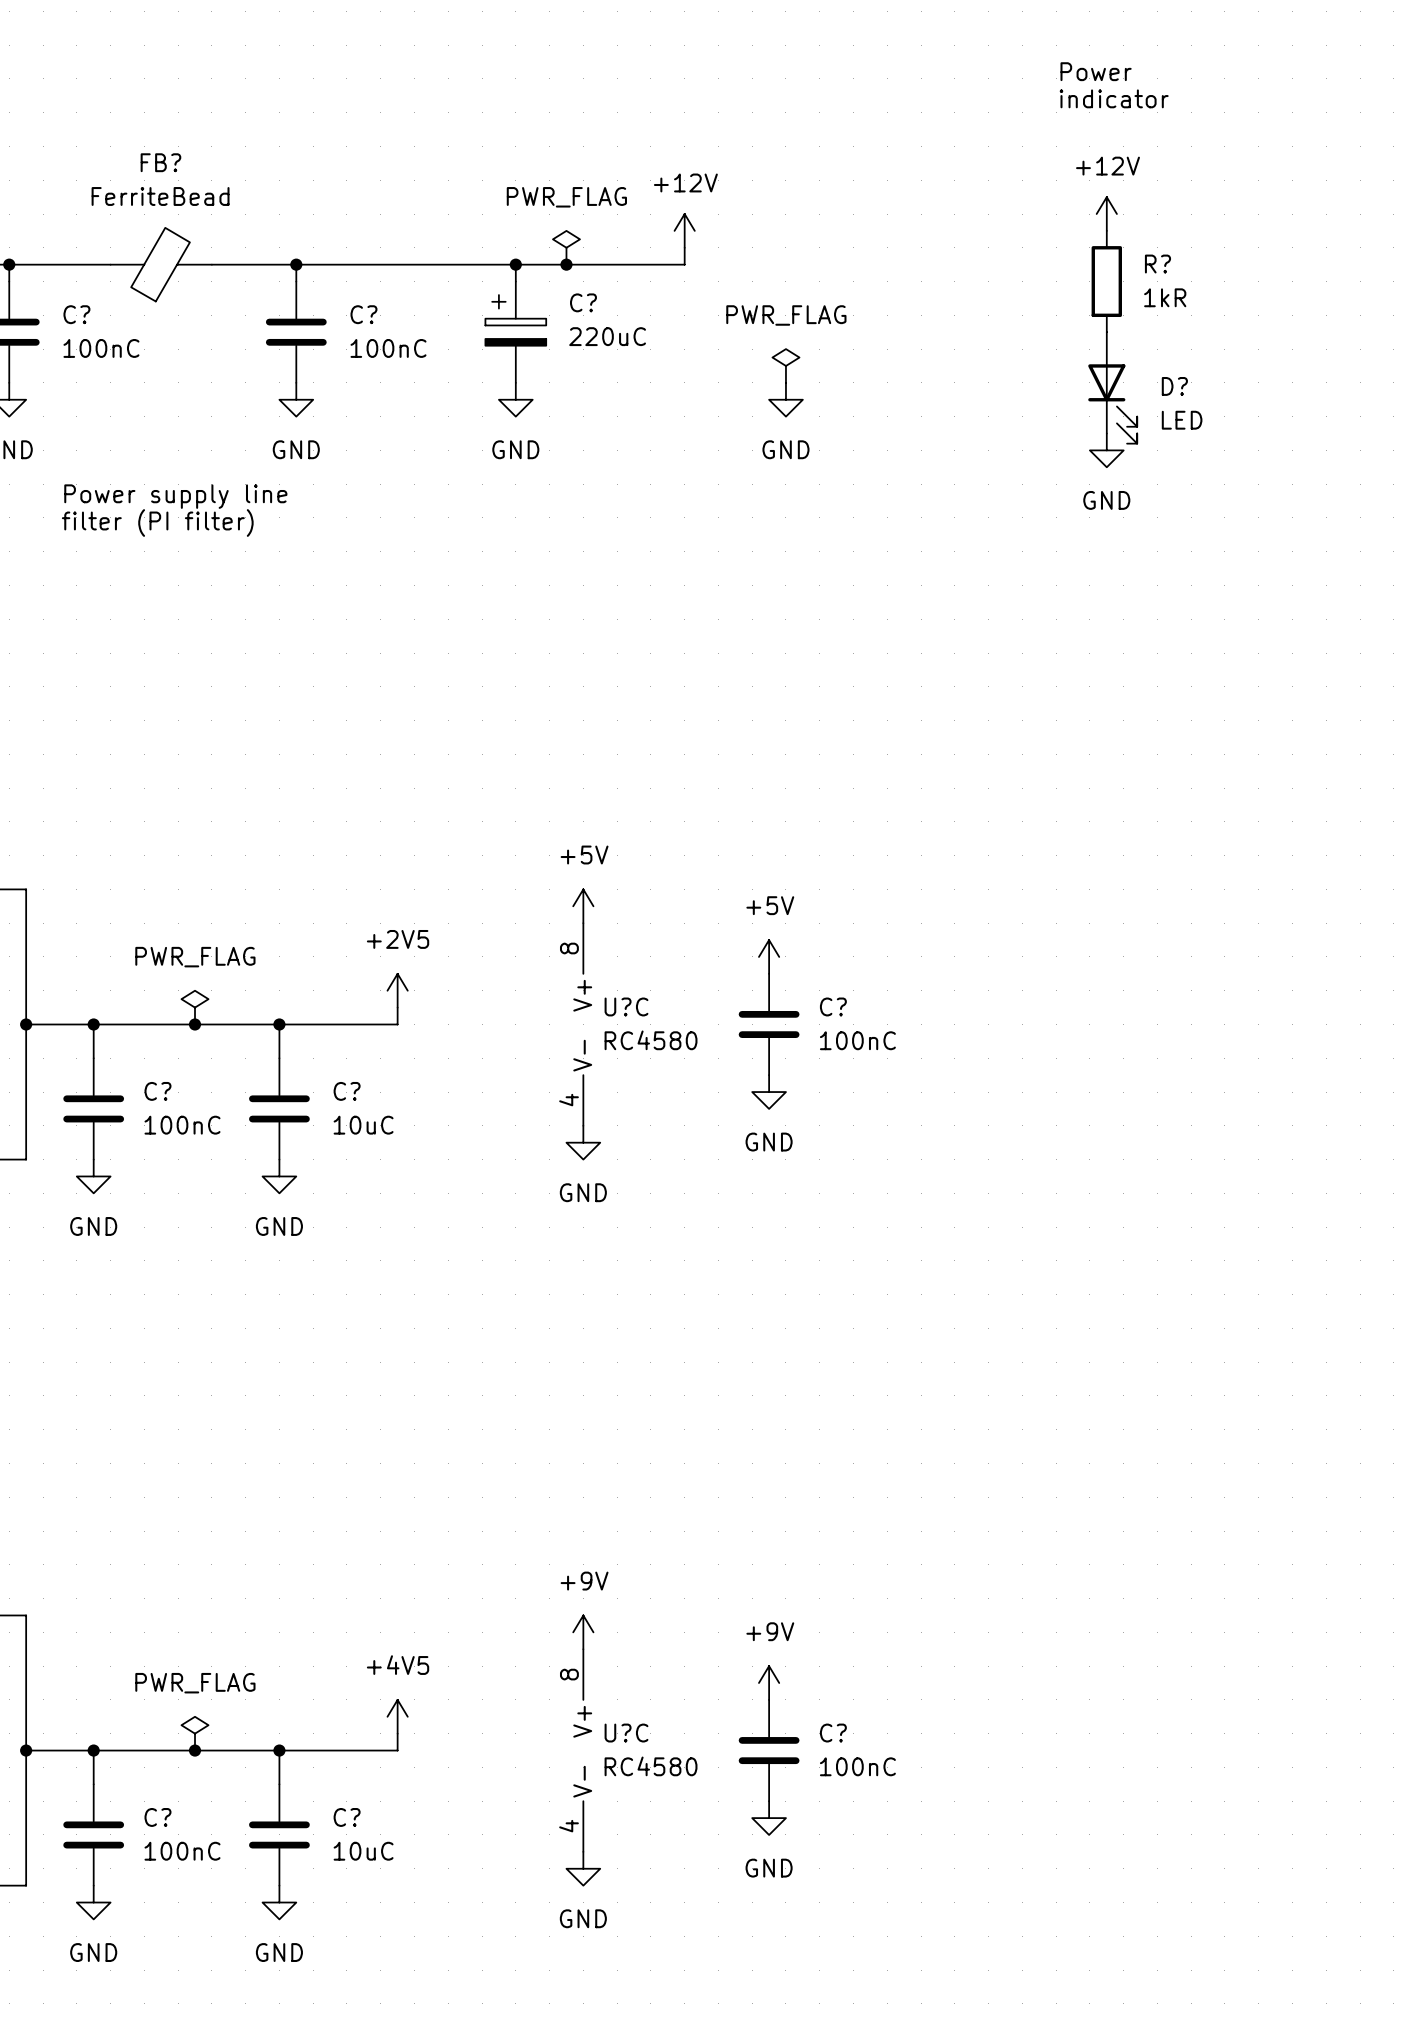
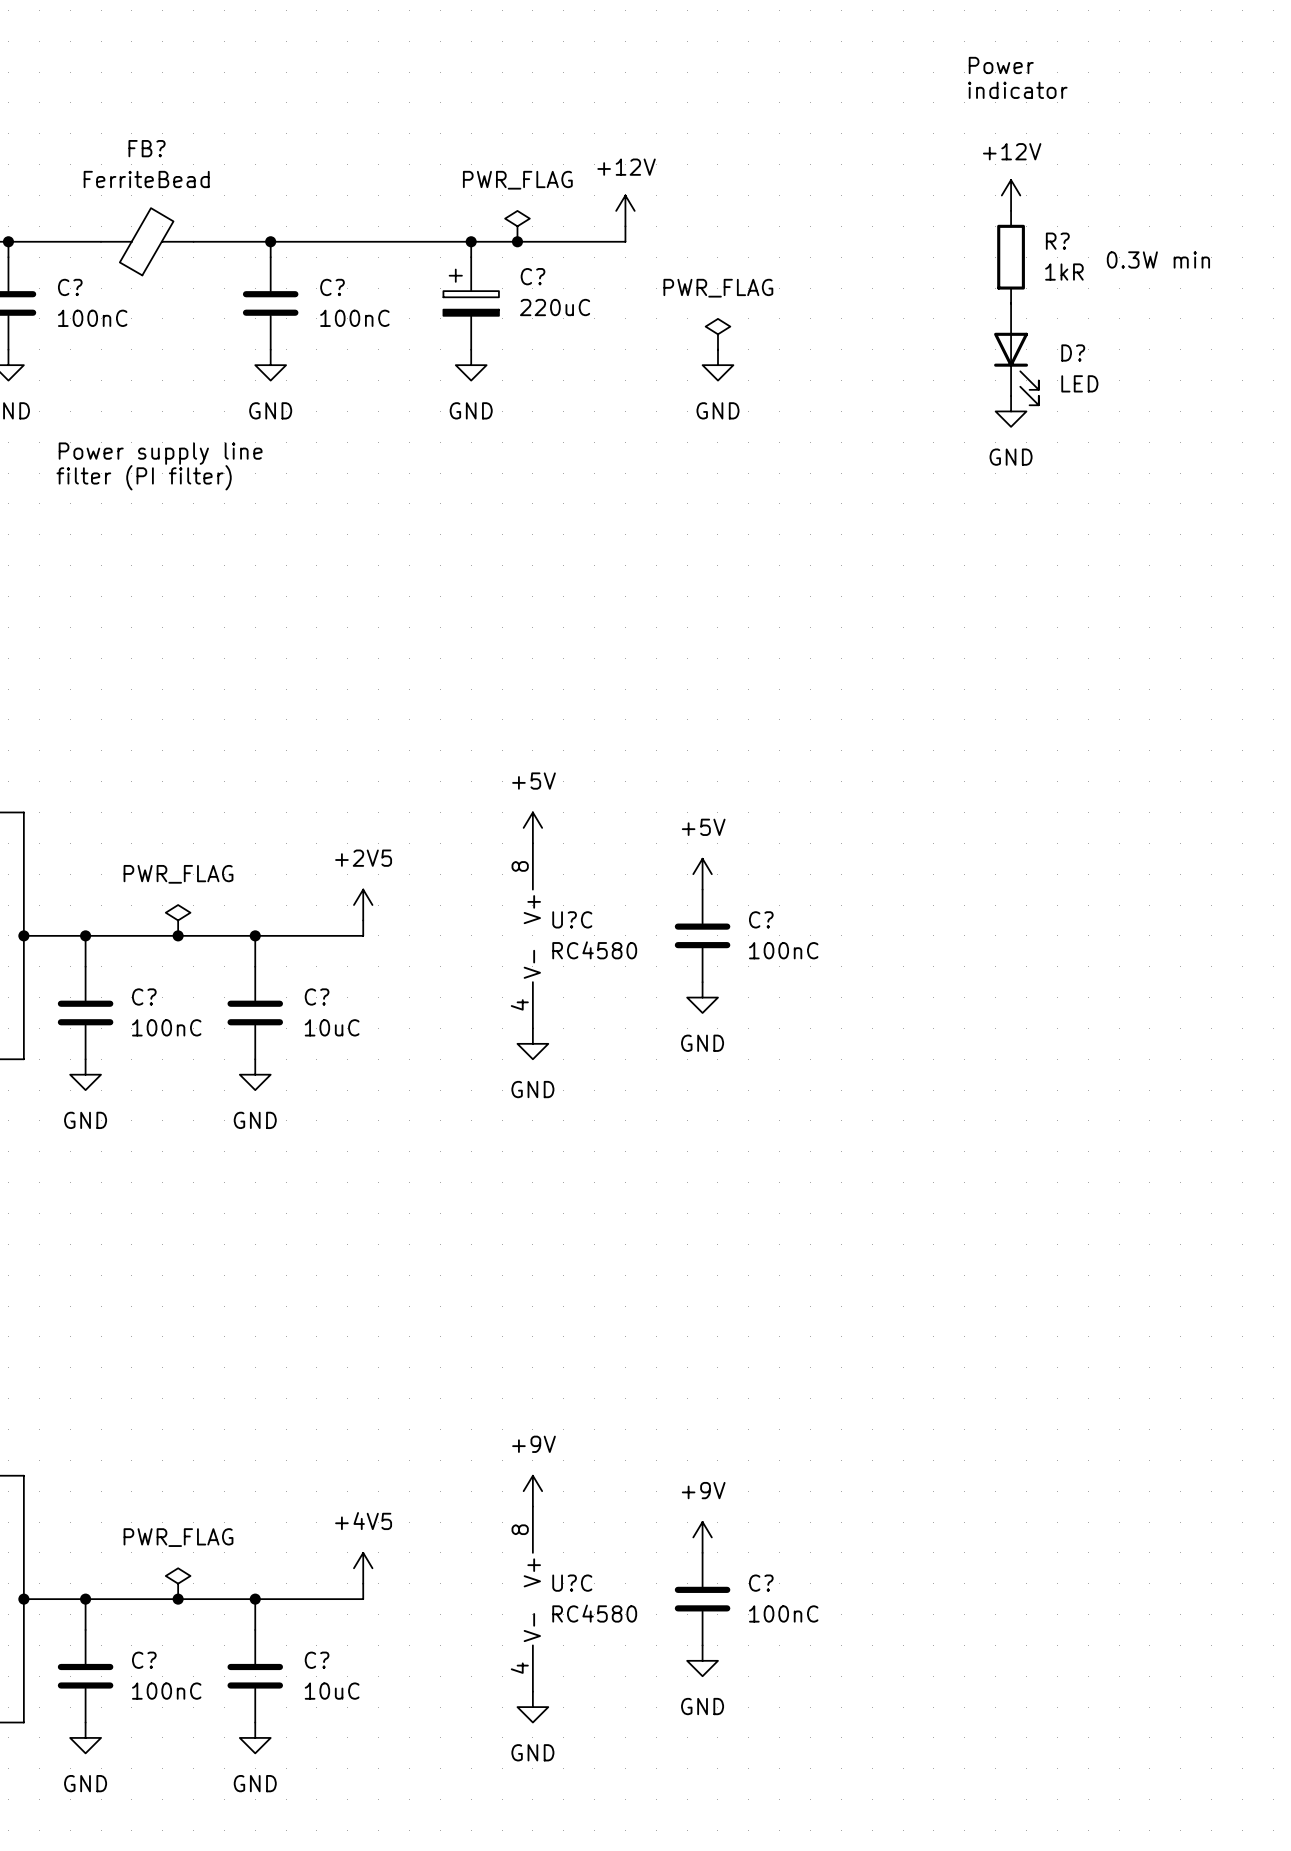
text: none -> 0.3W min (1158, 259)

